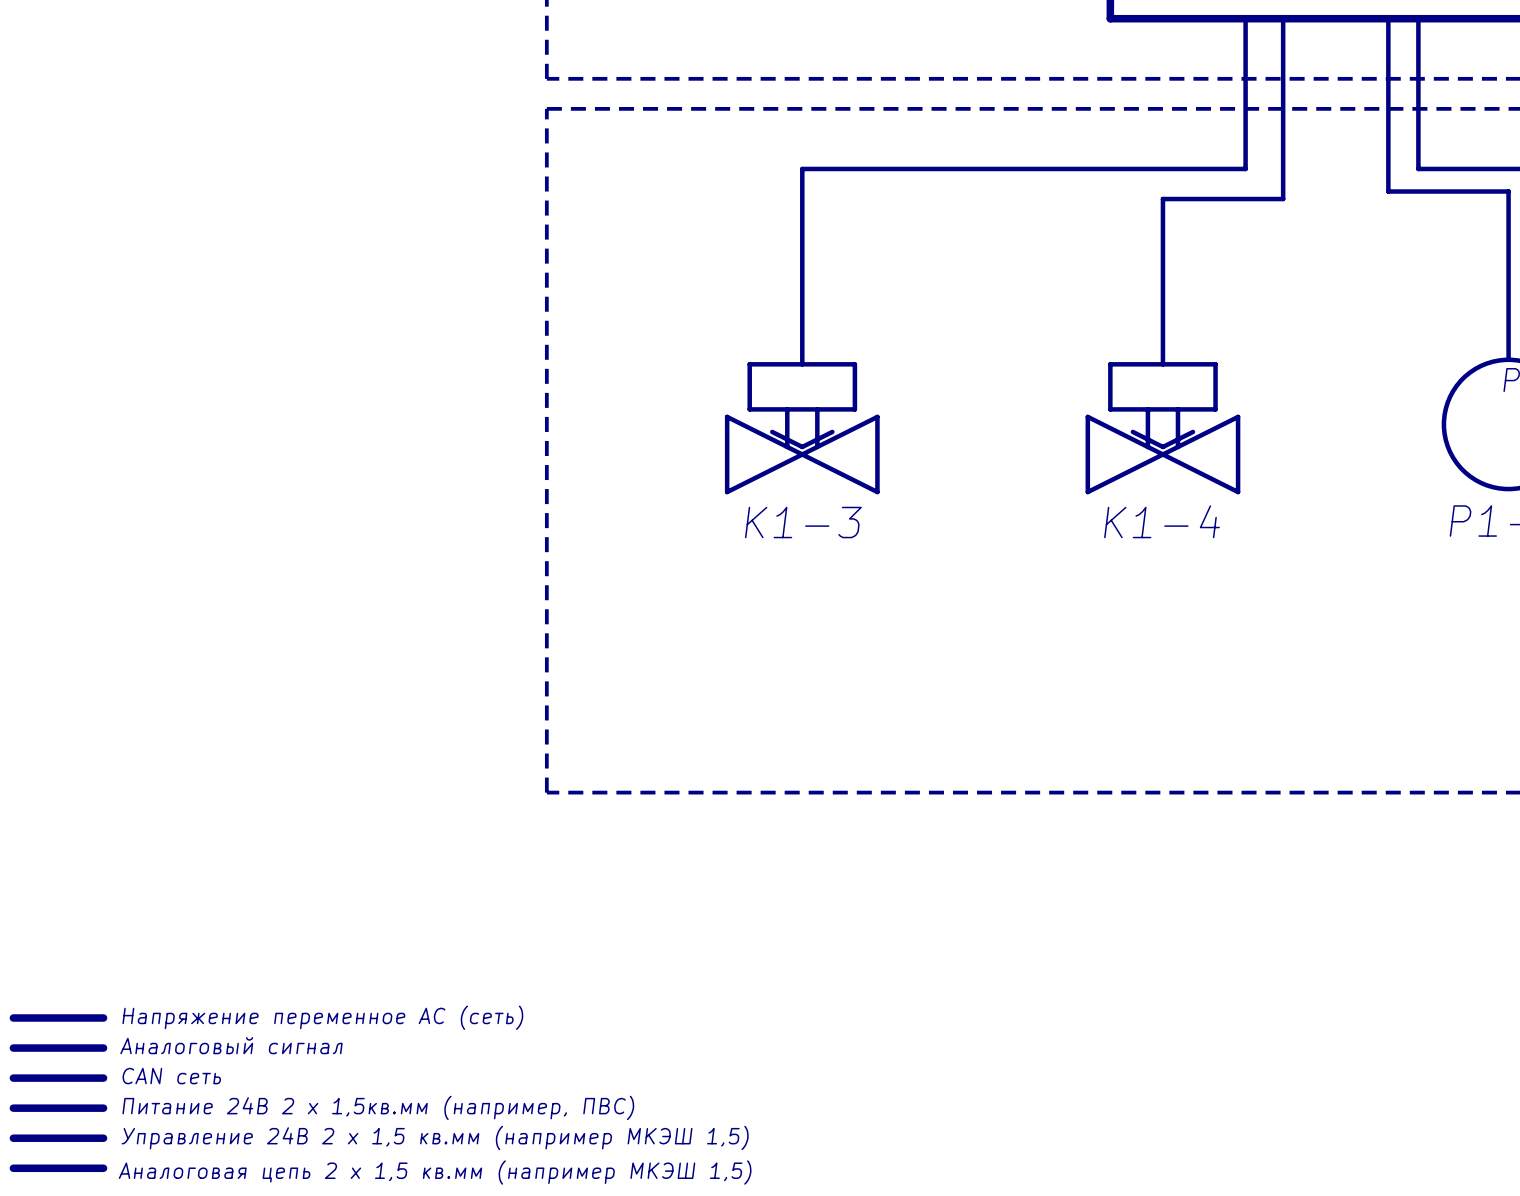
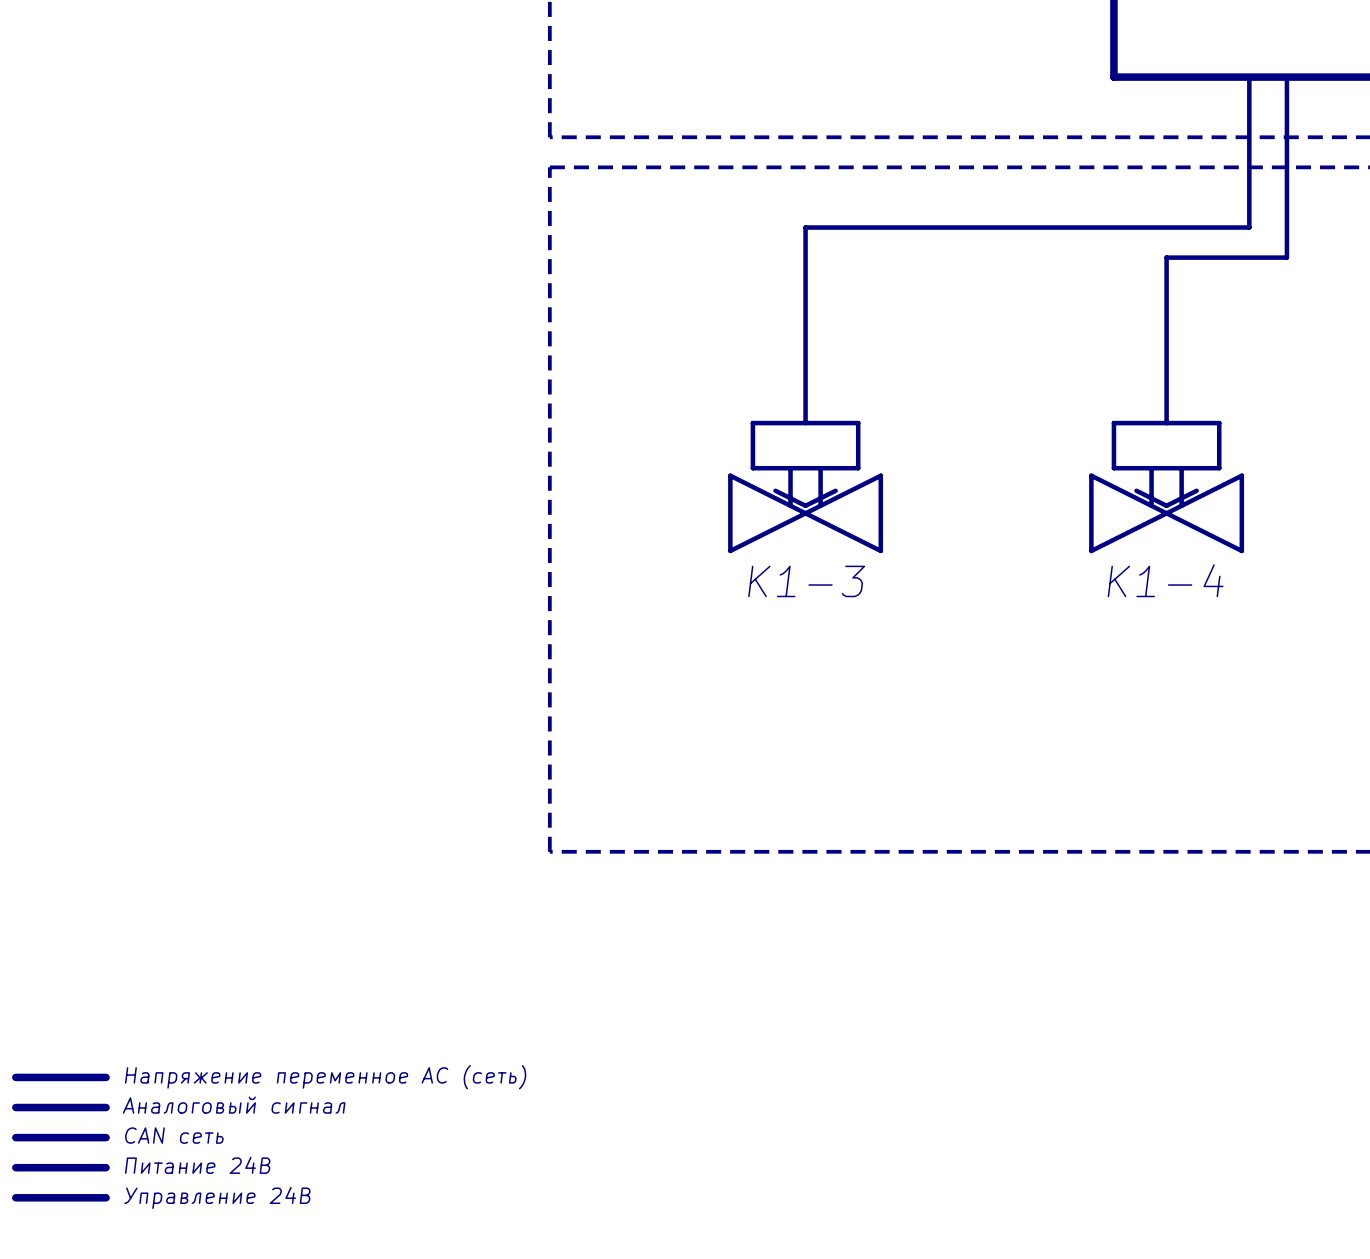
text: Питание 24В 2 x 1,5кв.мм (например, ПВС) (378, 1107) -> Питание 24В (197, 1165)
text: Управление 24В 2 х 1,5 кв.мм (например МКЭШ 1,5) (435, 1137) -> Управление 24В (217, 1197)
line: (13, 1168) (103, 1168) -> none
text: Аналоговая цепь 2 х 1,5 кв.мм (например МКЭШ 1,5) (435, 1172) -> none

